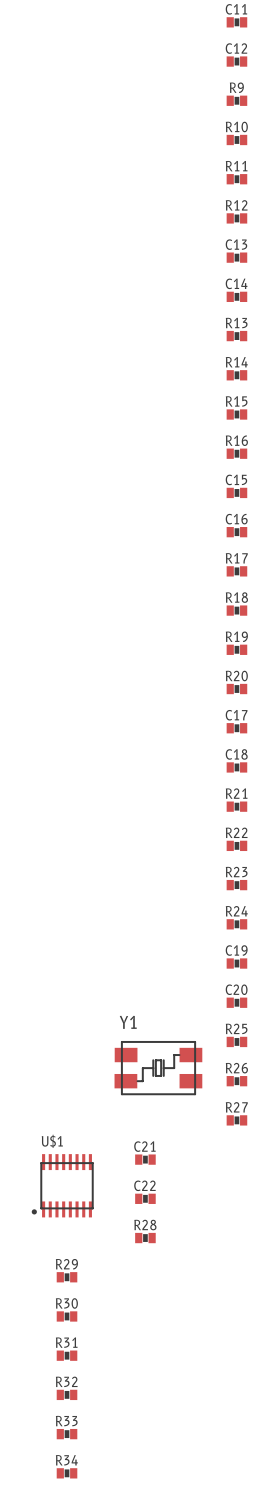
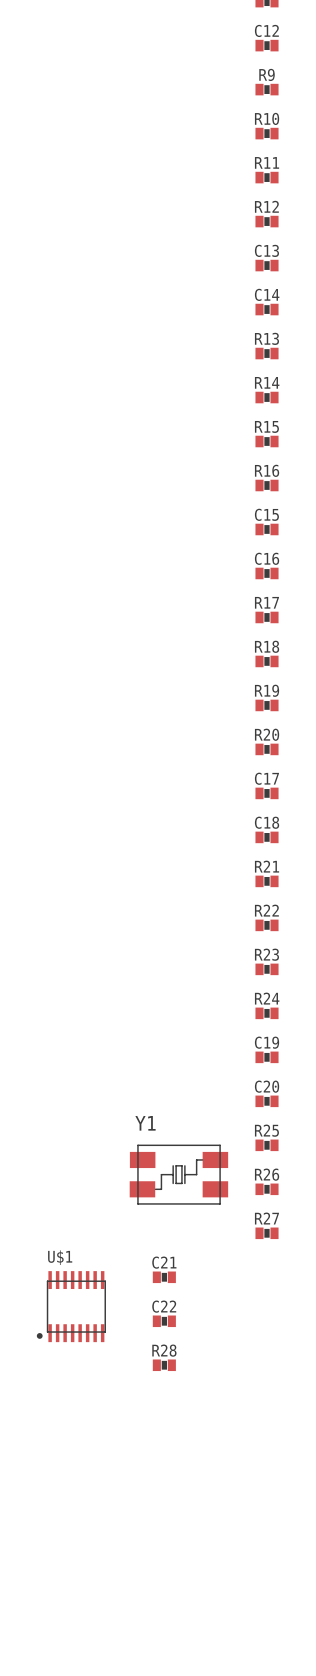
R29: (67, 1277) -> none
R30: (67, 1316) -> none
R31: (67, 1355) -> none
R32: (67, 1394) -> none
R33: (67, 1434) -> none
R34: (67, 1473) -> none

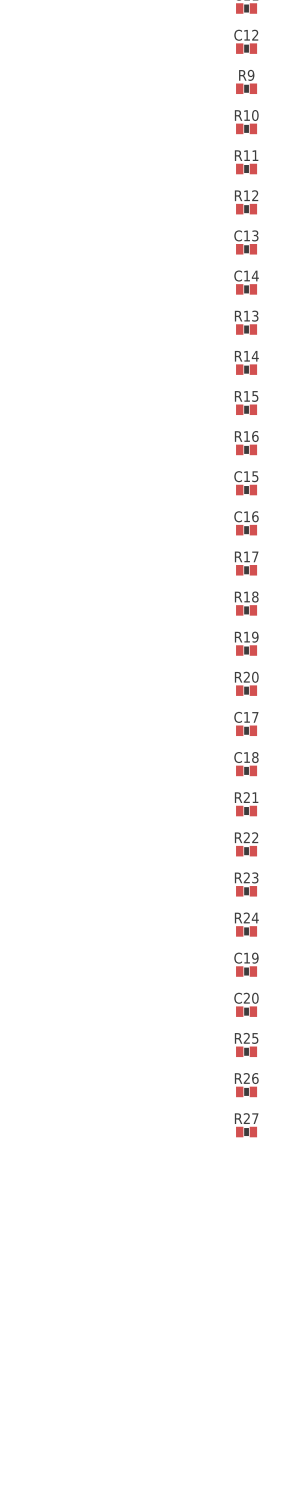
Y1: (178, 1174) -> none
C21: (164, 1277) -> none
U$1: (71, 1306) -> none
C22: (164, 1321) -> none
R28: (164, 1365) -> none

